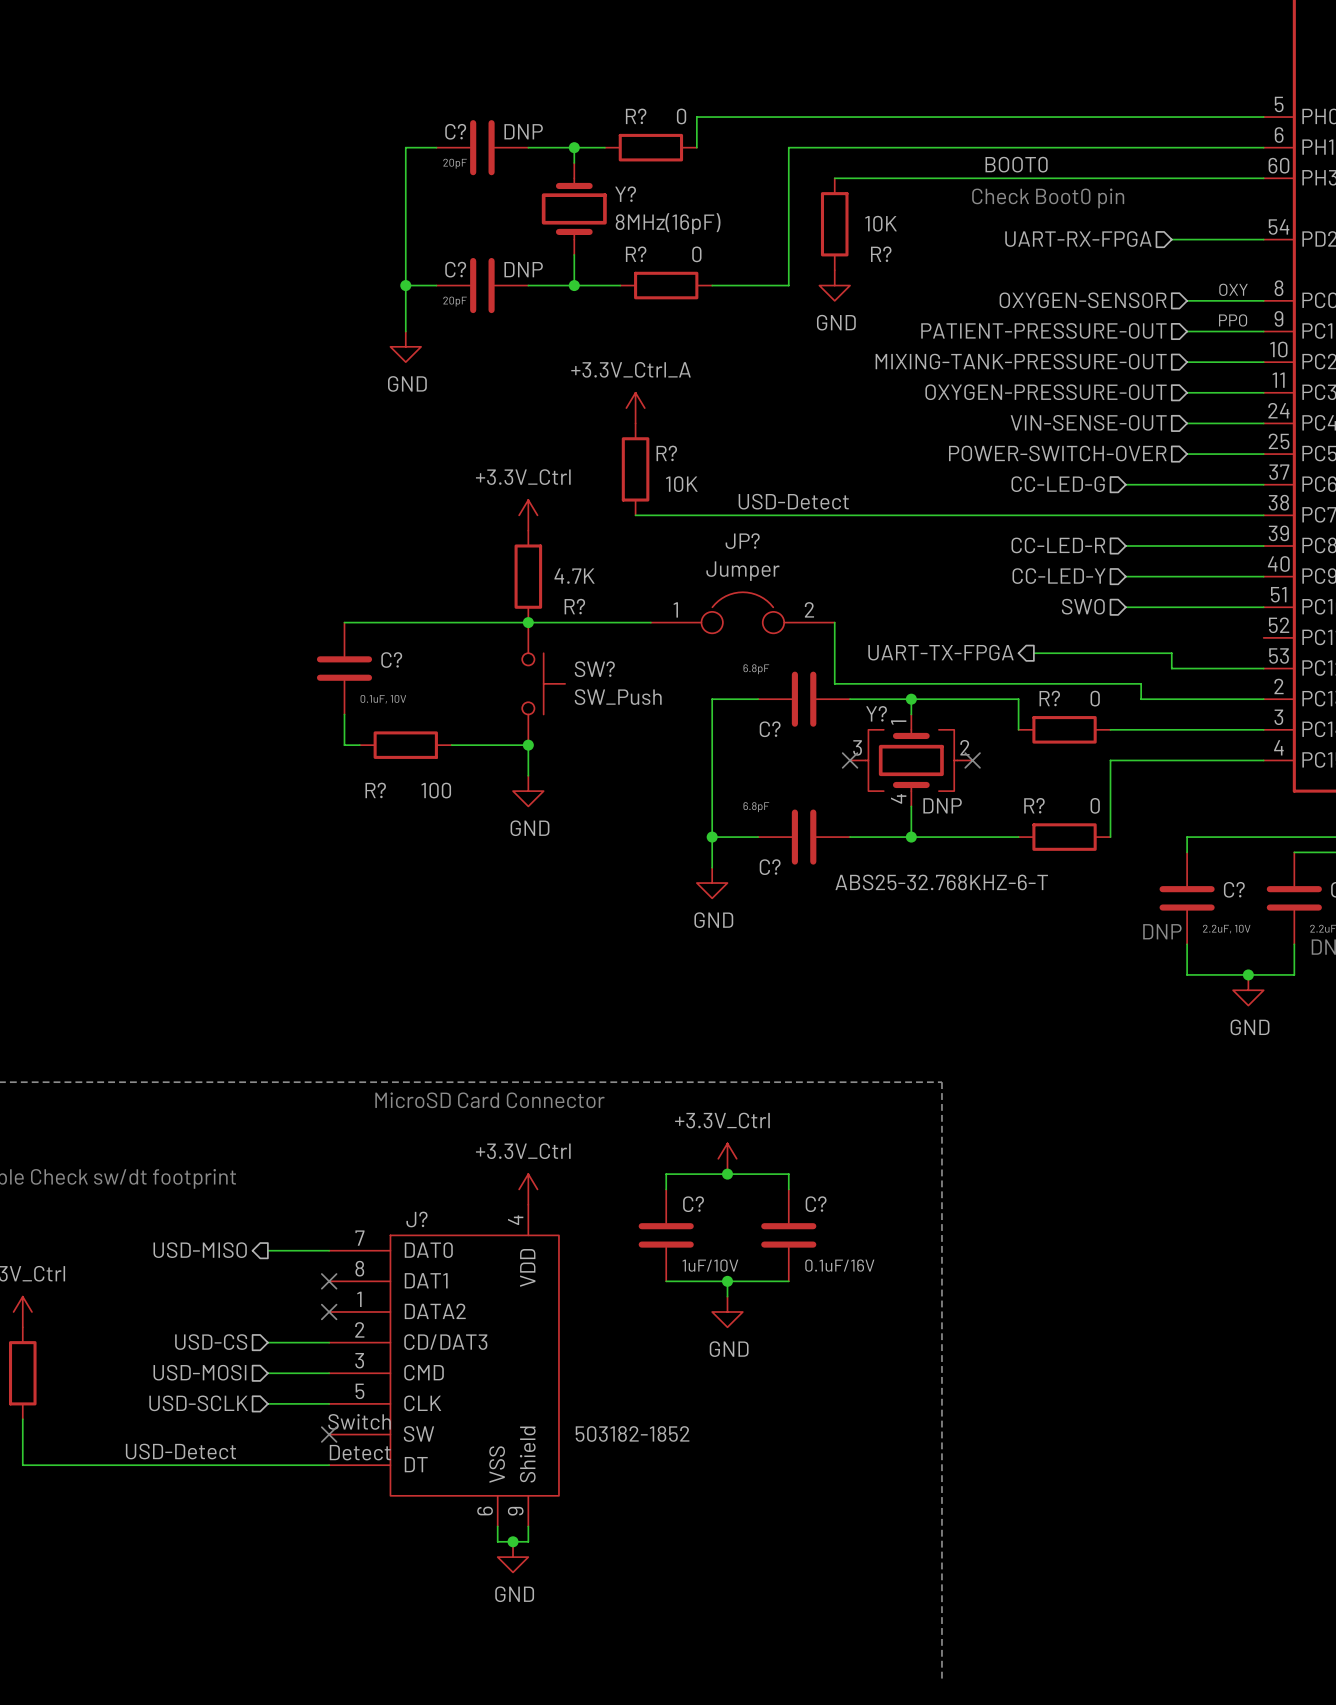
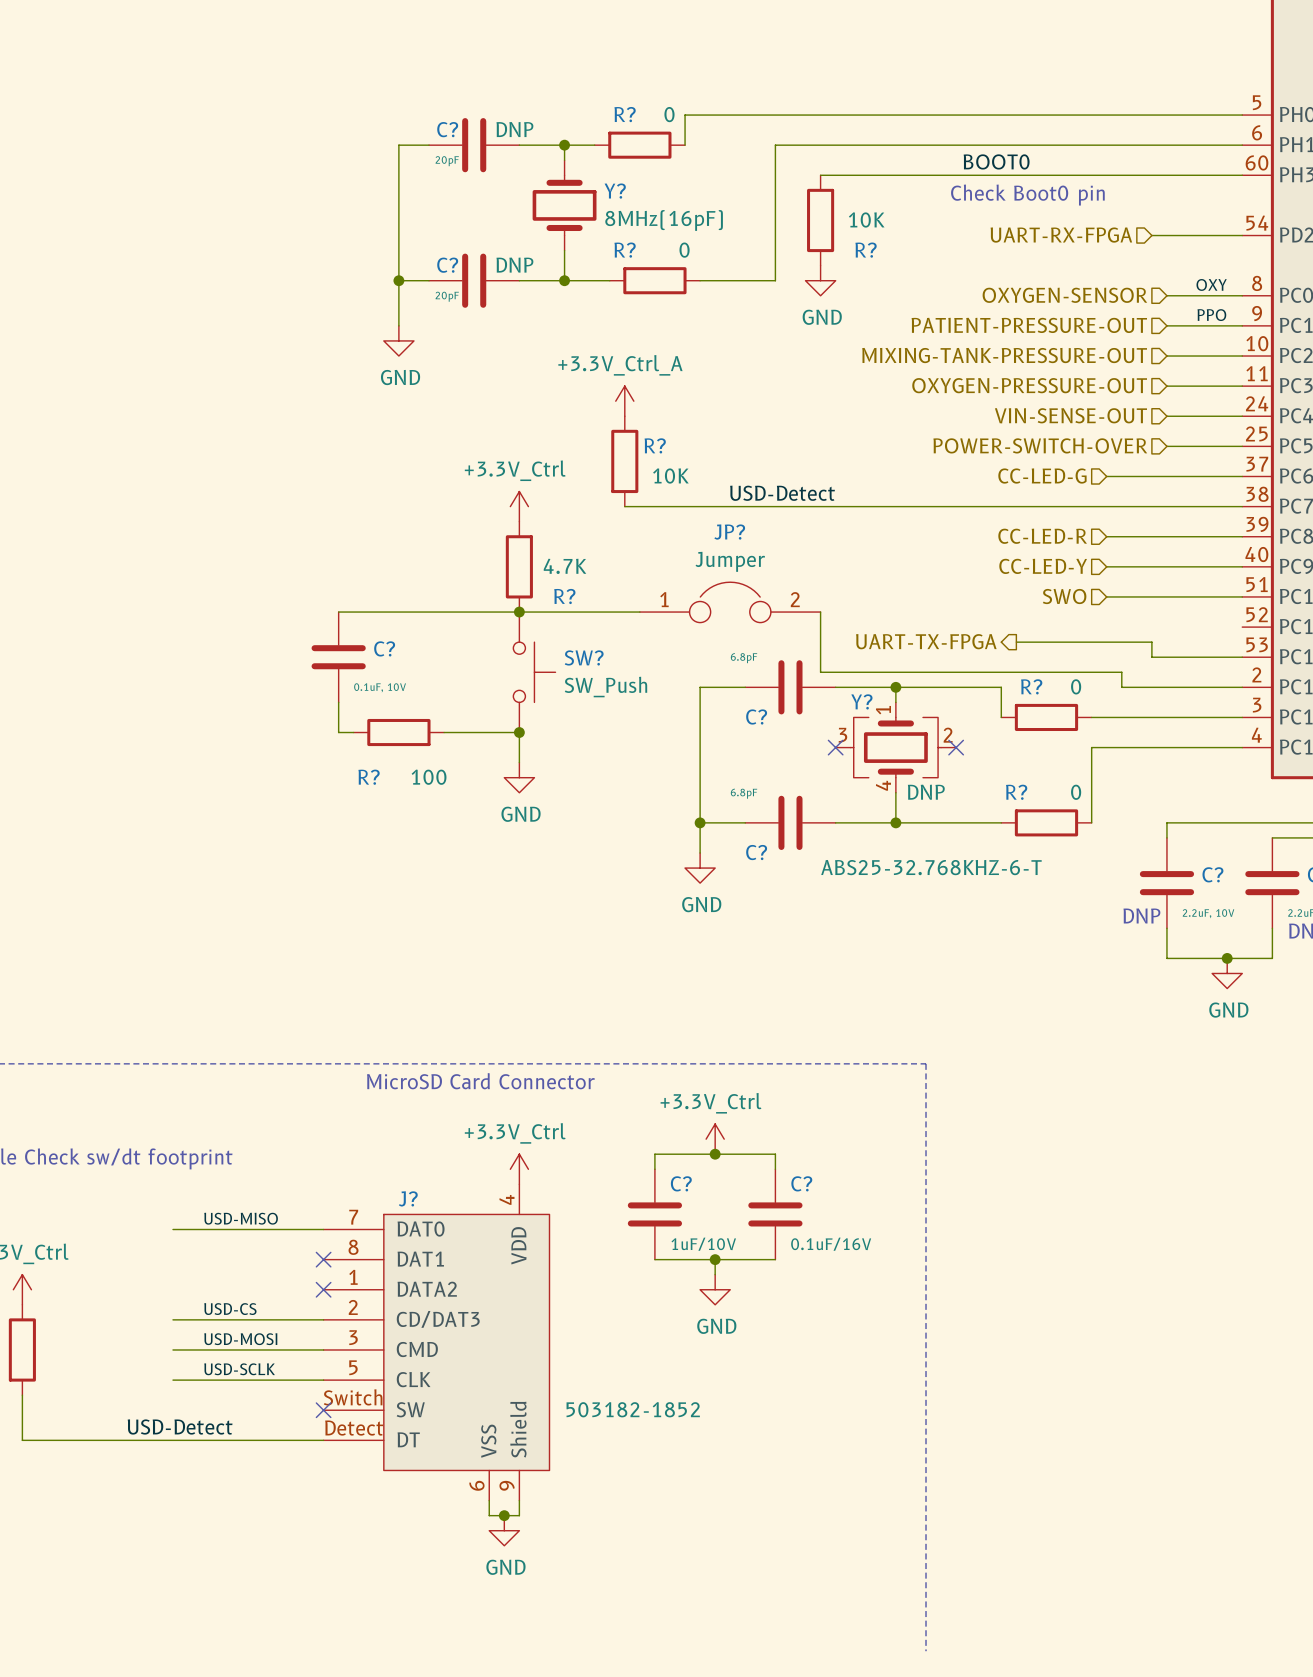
label: none -> USD-MISO (241, 1218)
wire: none -> (172, 1229) (263, 1229)
hierarchical label: USD-MISO (200, 1250) -> none
label: none -> USD-CS (230, 1309)
wire: none -> (172, 1319) (263, 1319)
hierarchical label: USD-CS (211, 1342) -> none
label: none -> USD-MOSI (240, 1339)
hierarchical label: USD-MOSI (199, 1372) -> none
wire: none -> (172, 1349) (263, 1349)
label: none -> USD-SCLK (239, 1369)
wire: none -> (172, 1380) (263, 1380)
hierarchical label: USD-SCLK (198, 1403) -> none

